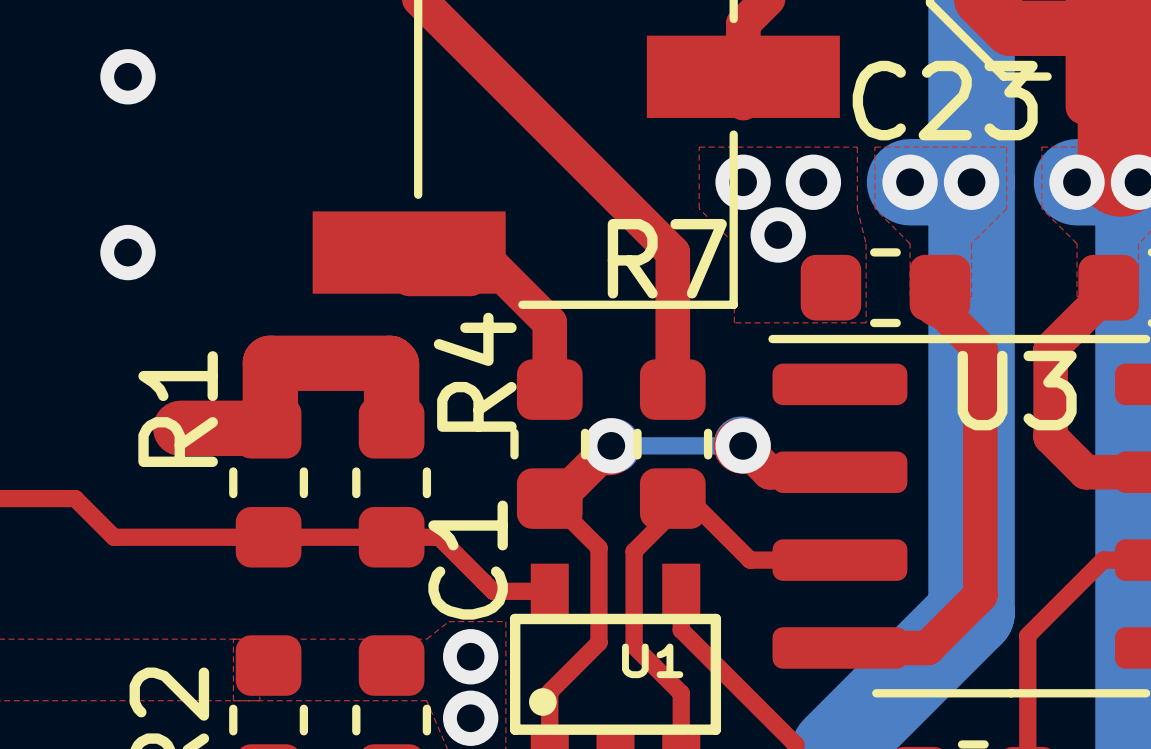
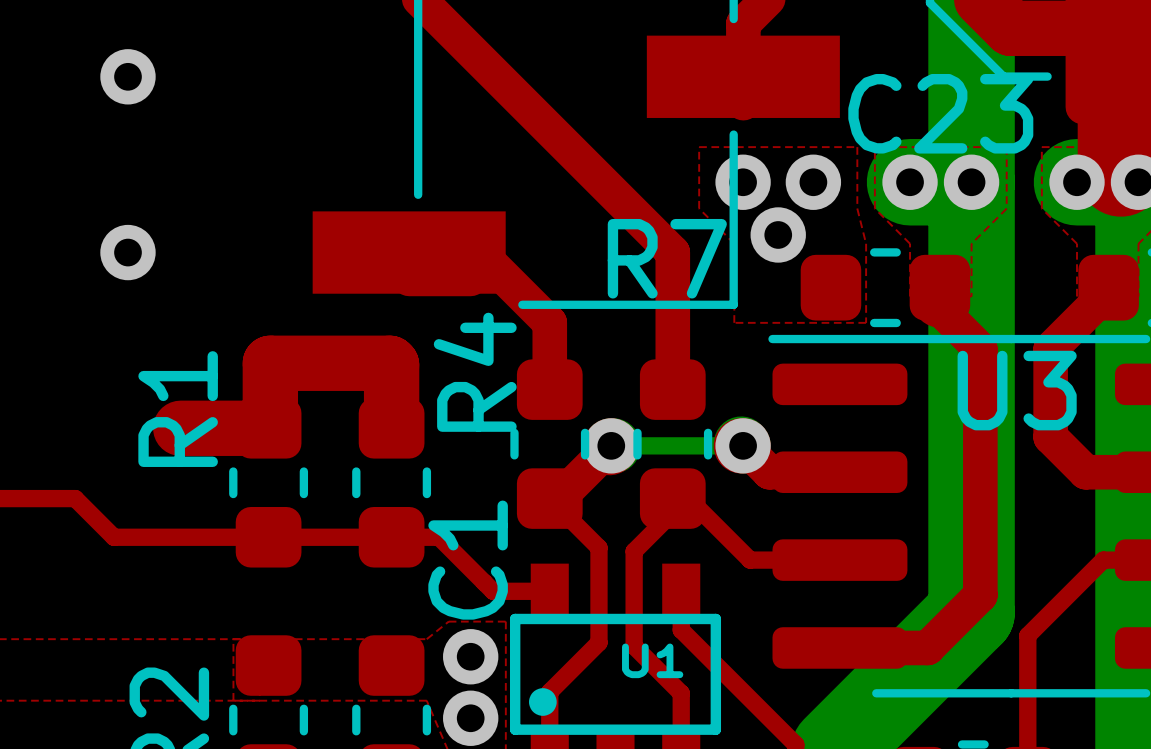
C23 name position: C23 (945, 100) -> C23 (940, 113)

